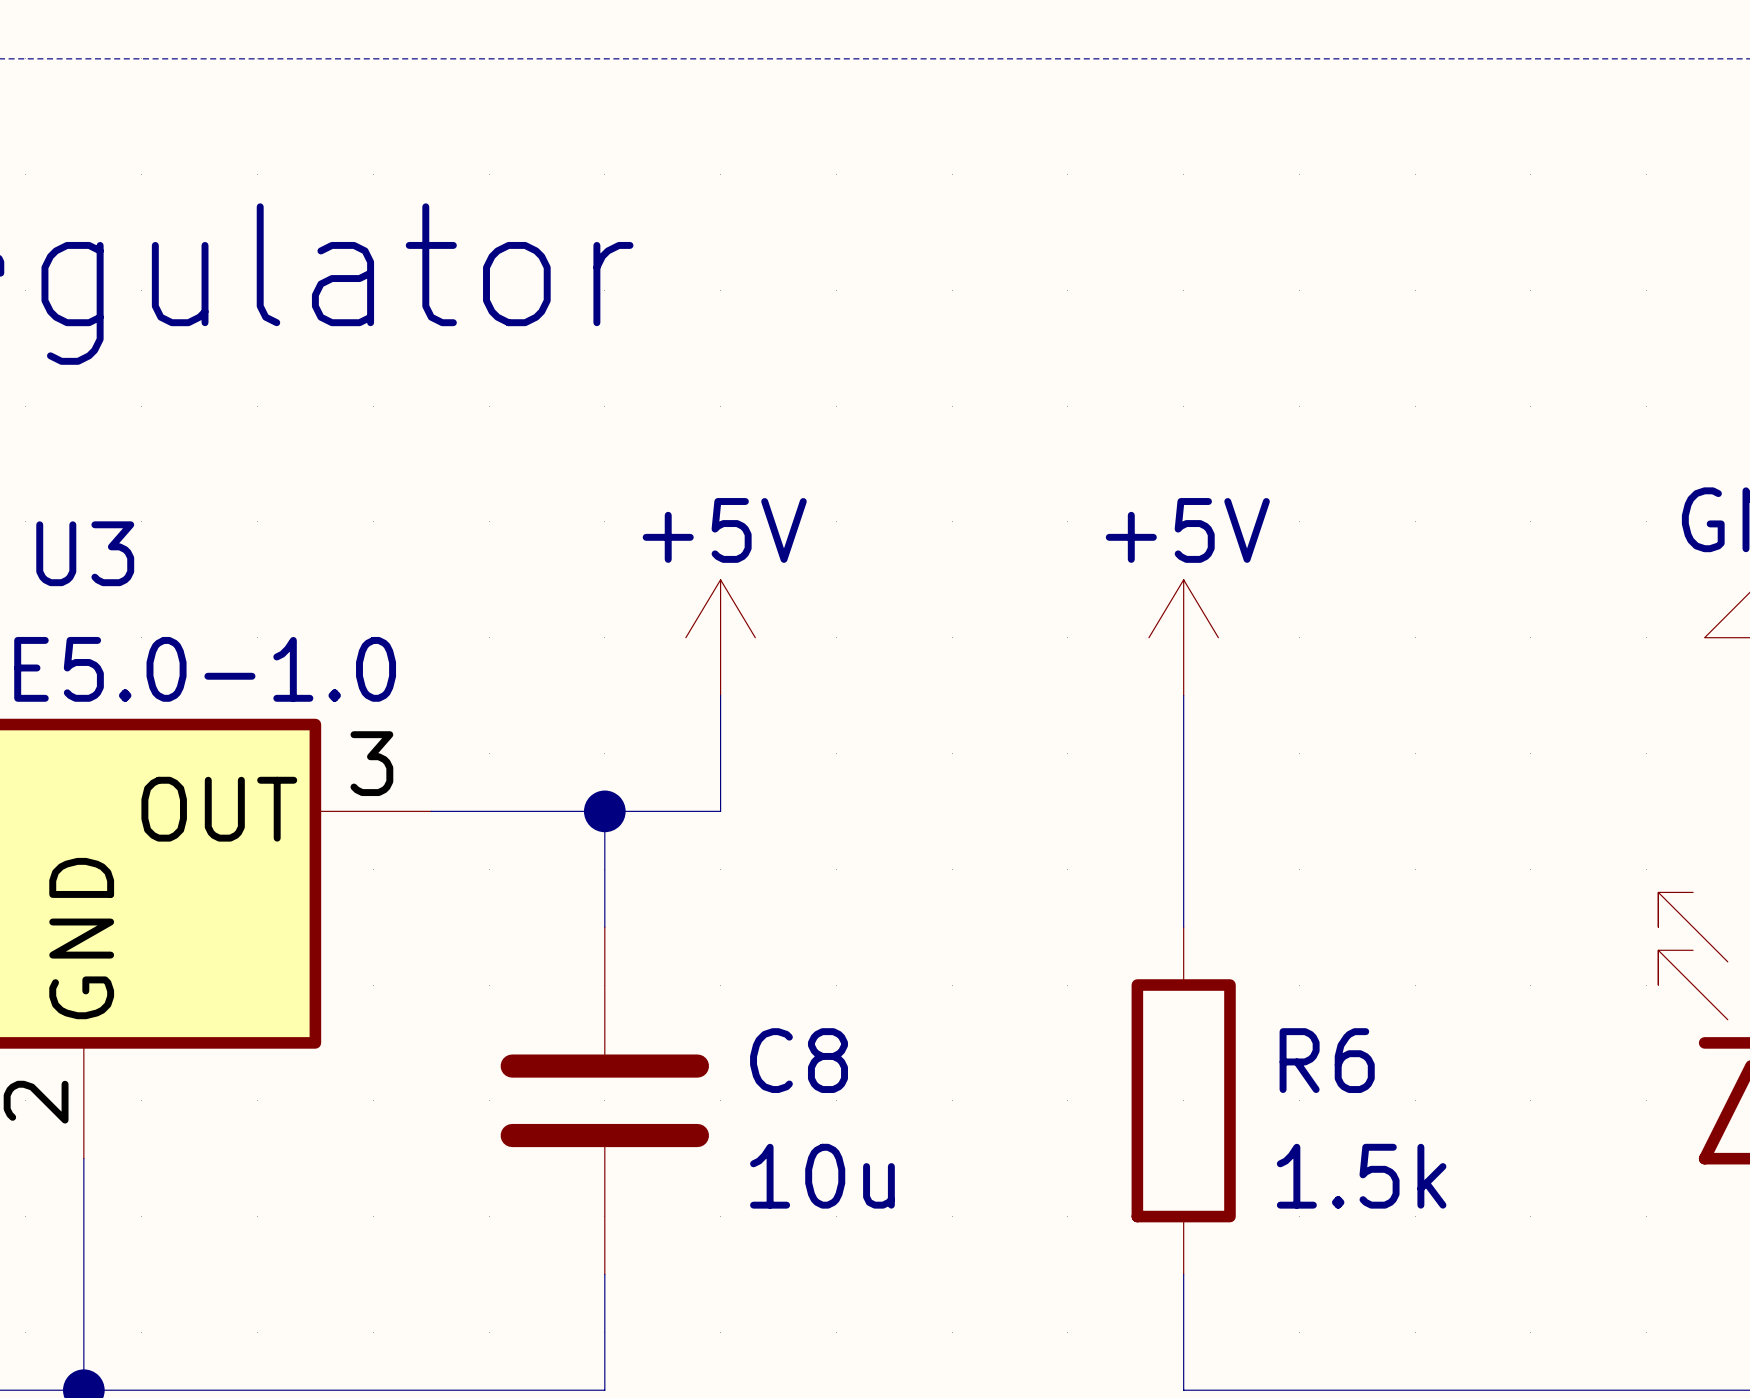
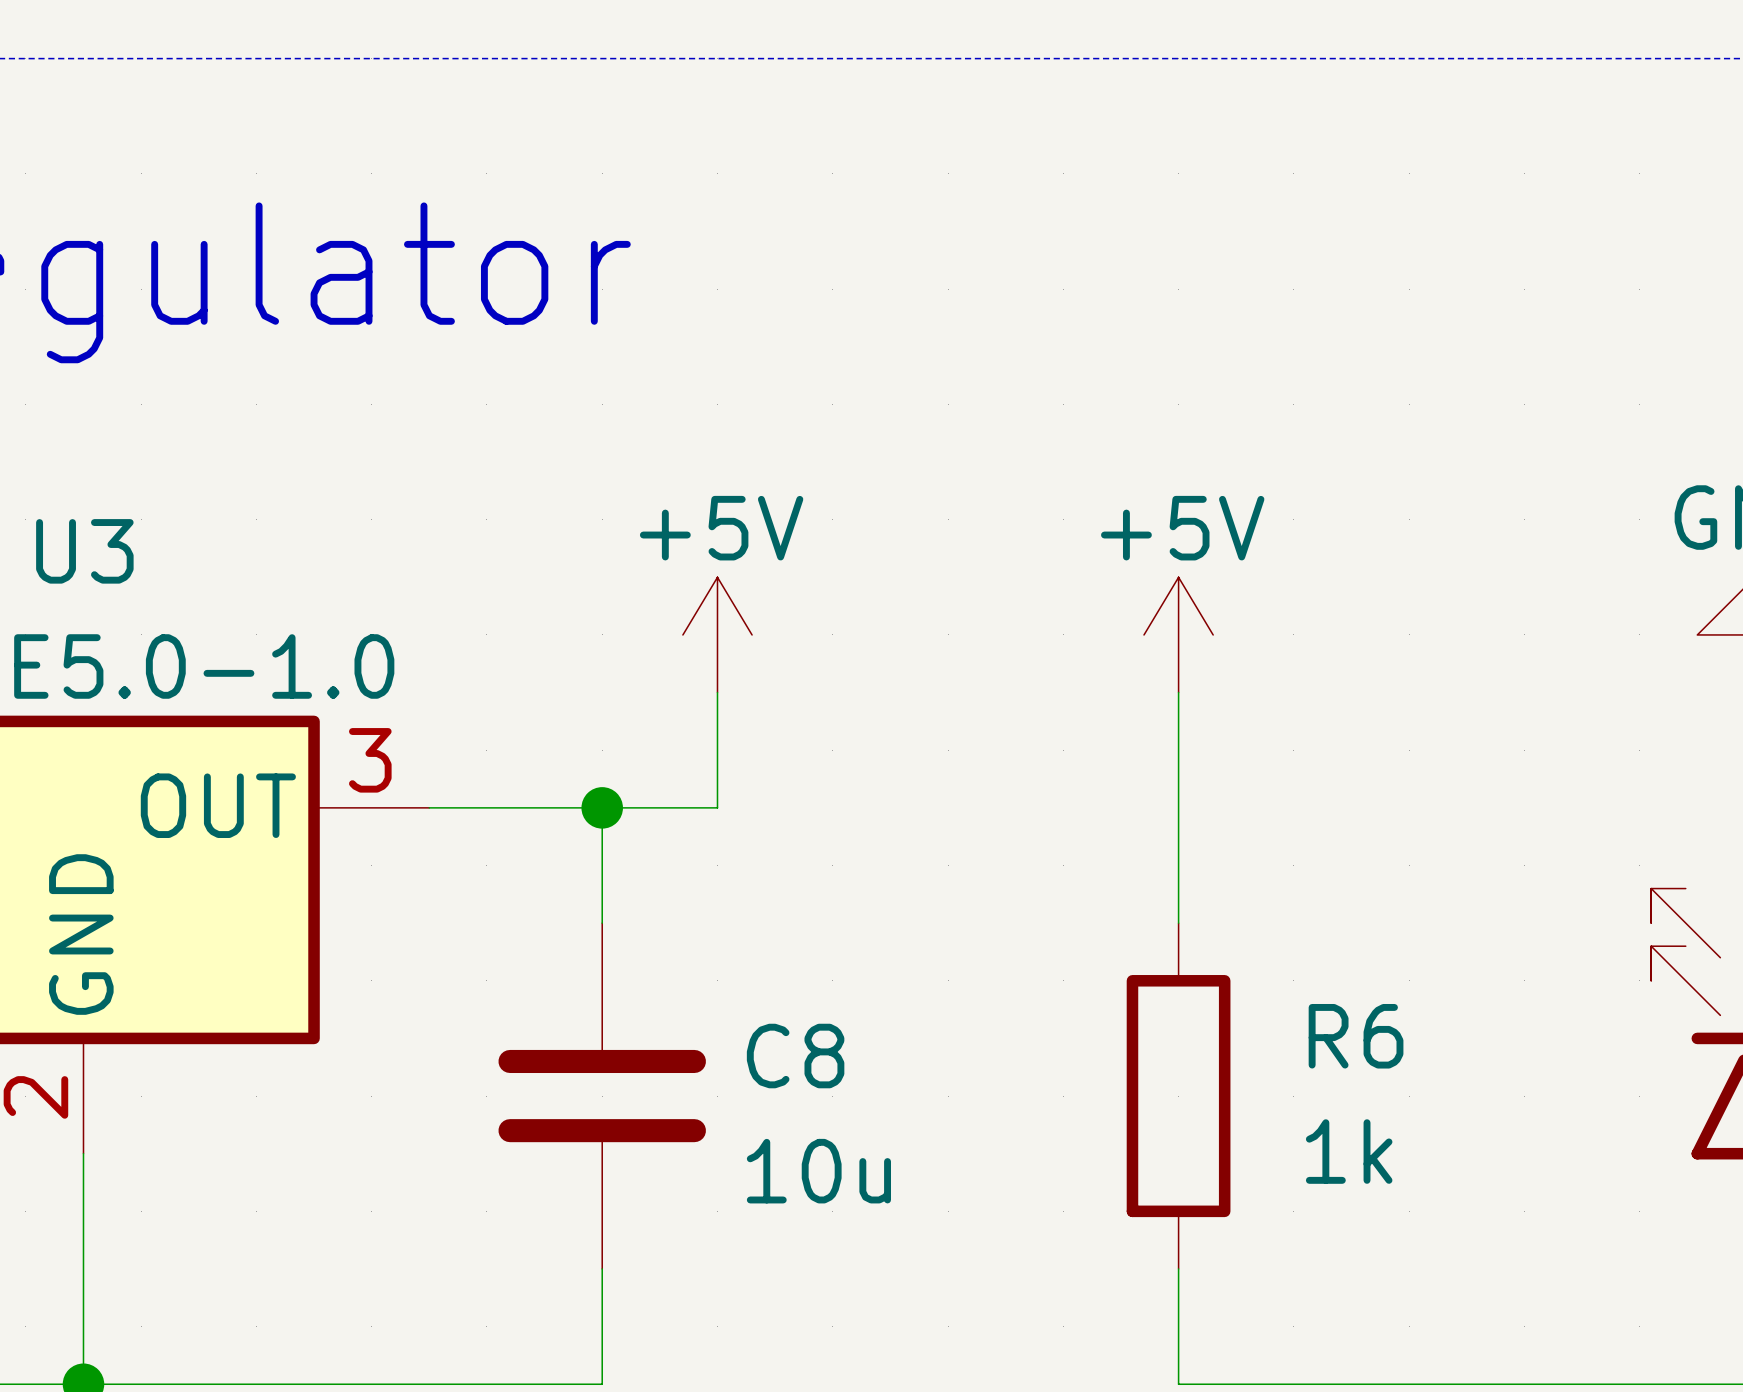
R6 name position: R6 (1327, 1060) -> R6 (1356, 1036)
R6 value: 1.5k (1361, 1176) -> 1k (1349, 1151)

